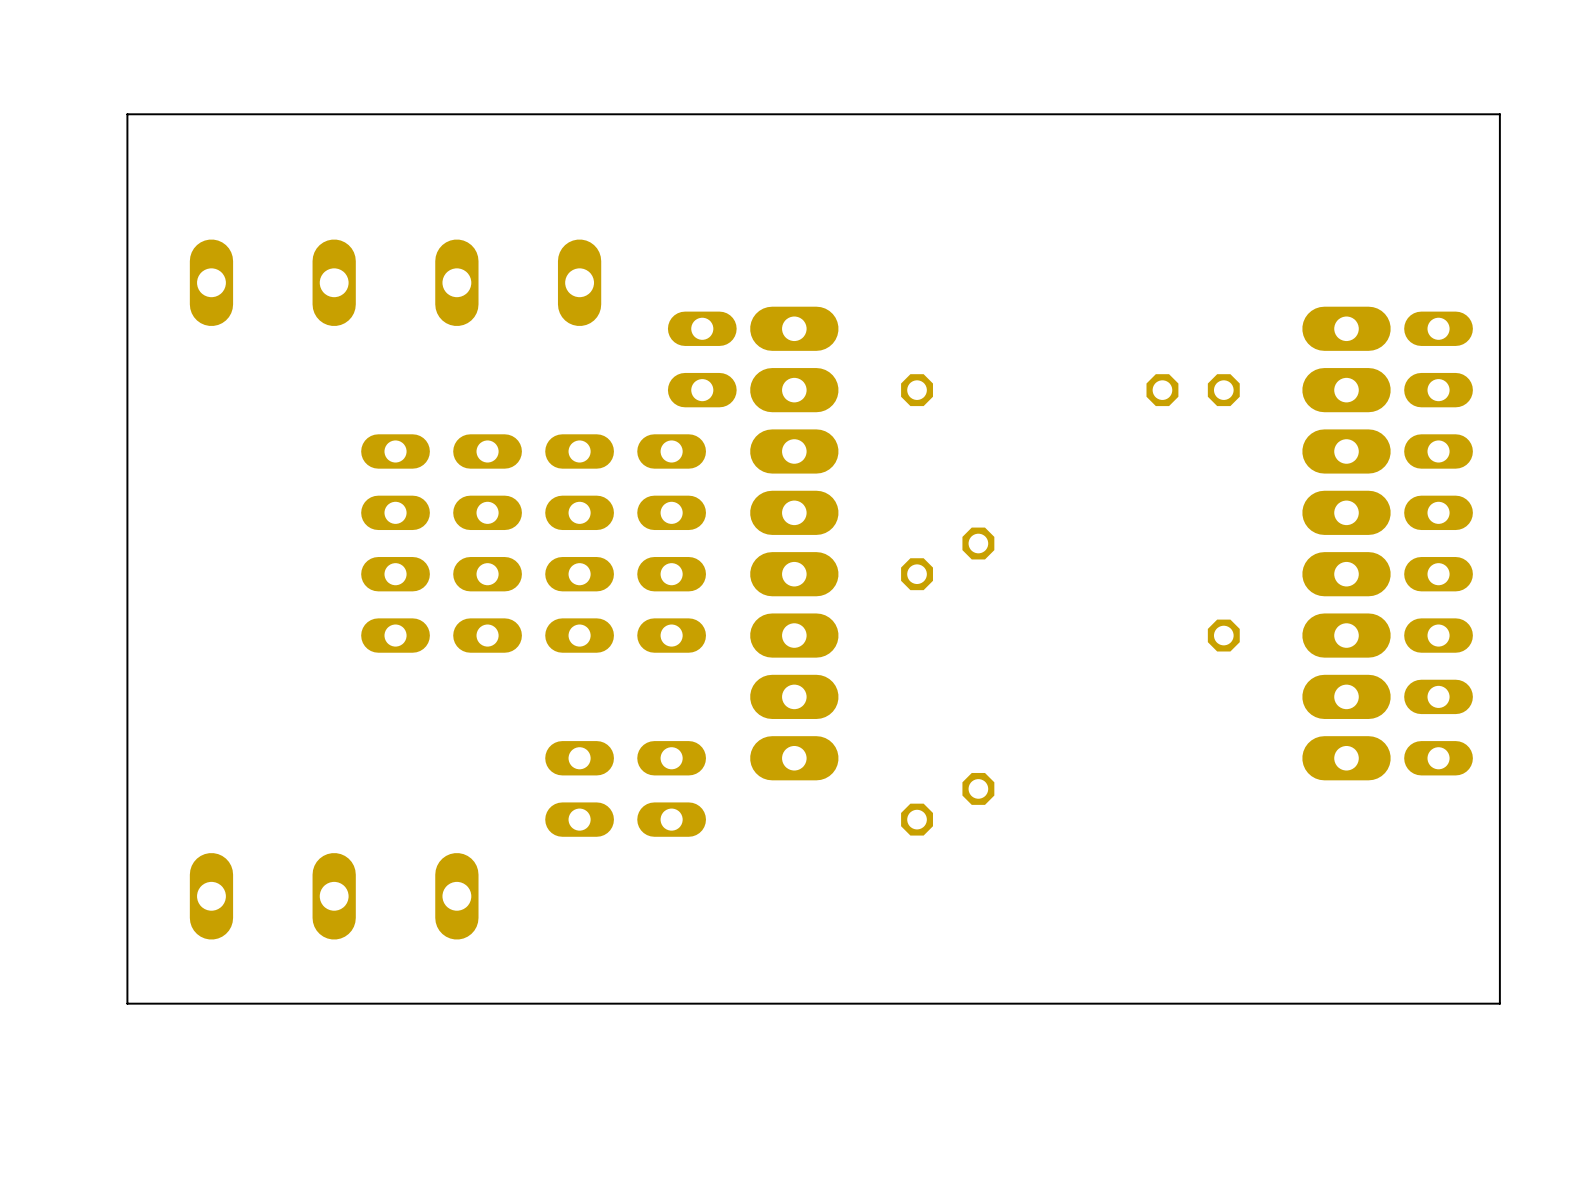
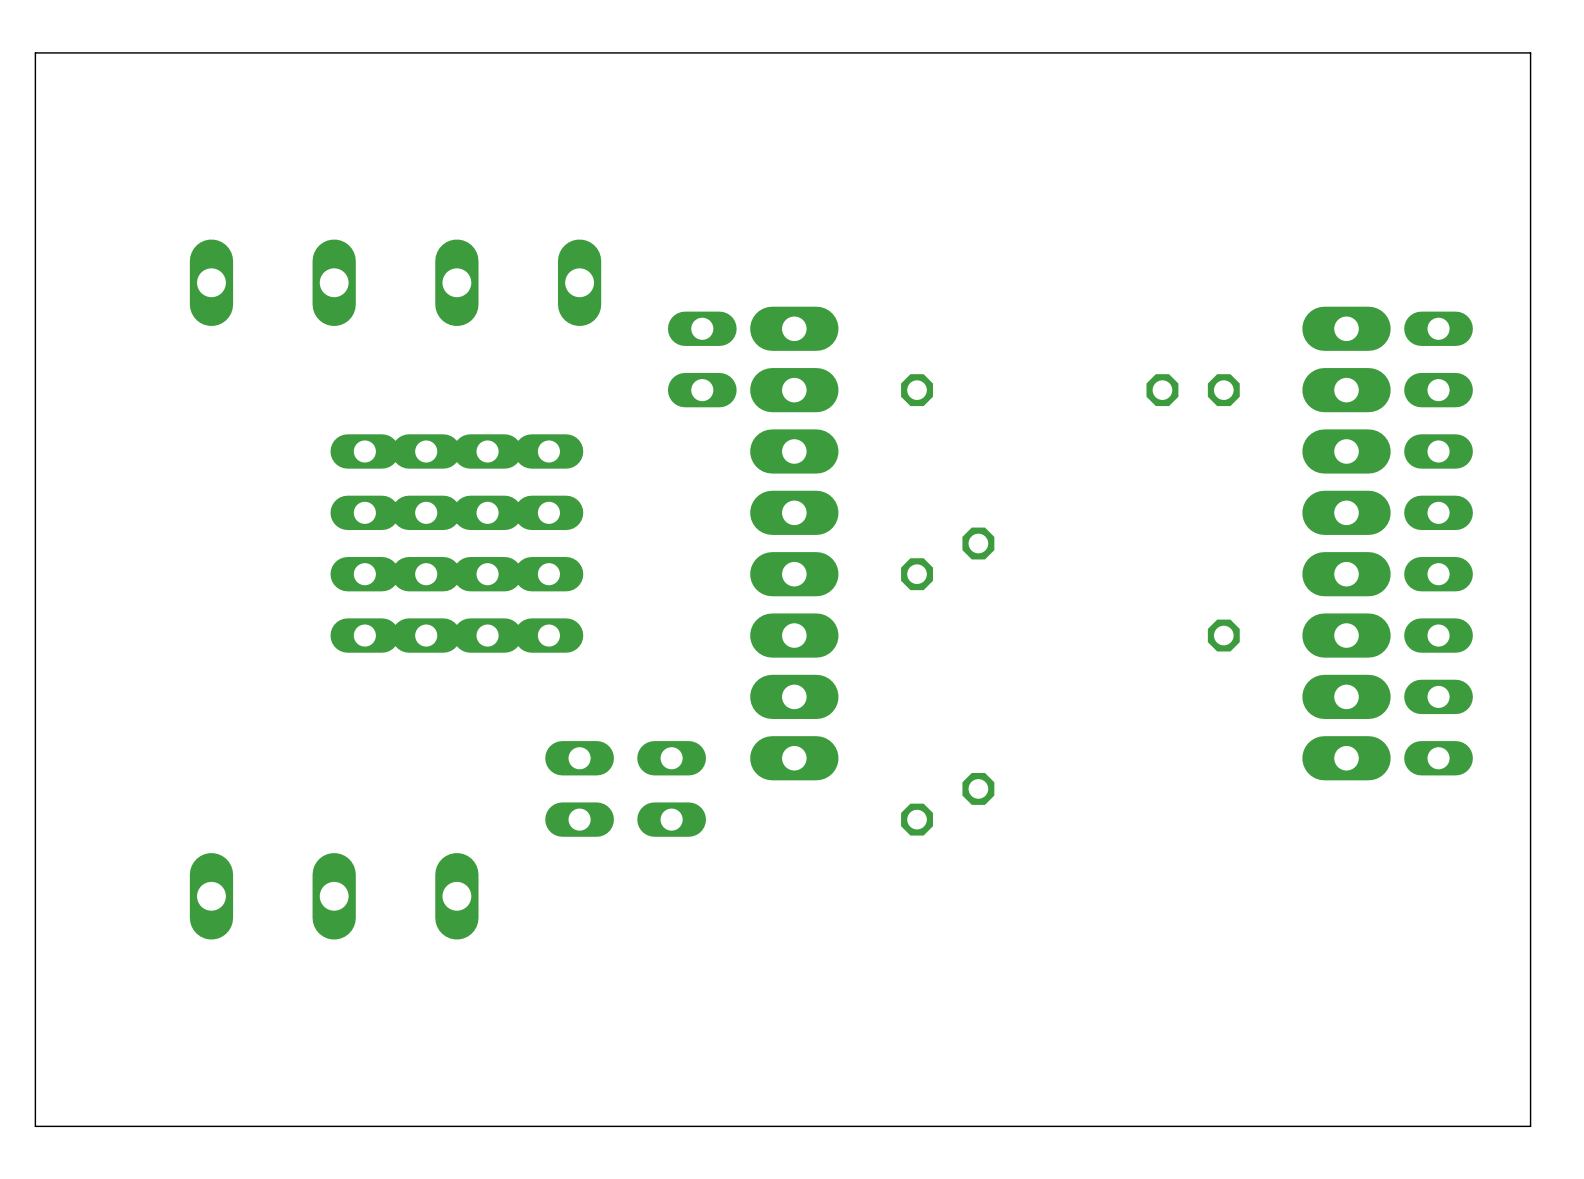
board edge: (1499, 114) (127, 114) (127, 1003) (1499, 1003) (1499, 114) -> (1530, 52) (1530, 1126) (35, 1126) (35, 52) (1530, 52)
part: none -> (364, 543)
part: (395, 543) -> none
part: none -> (426, 543)
part position: (579, 543) -> (548, 543)
part: (671, 543) -> none

